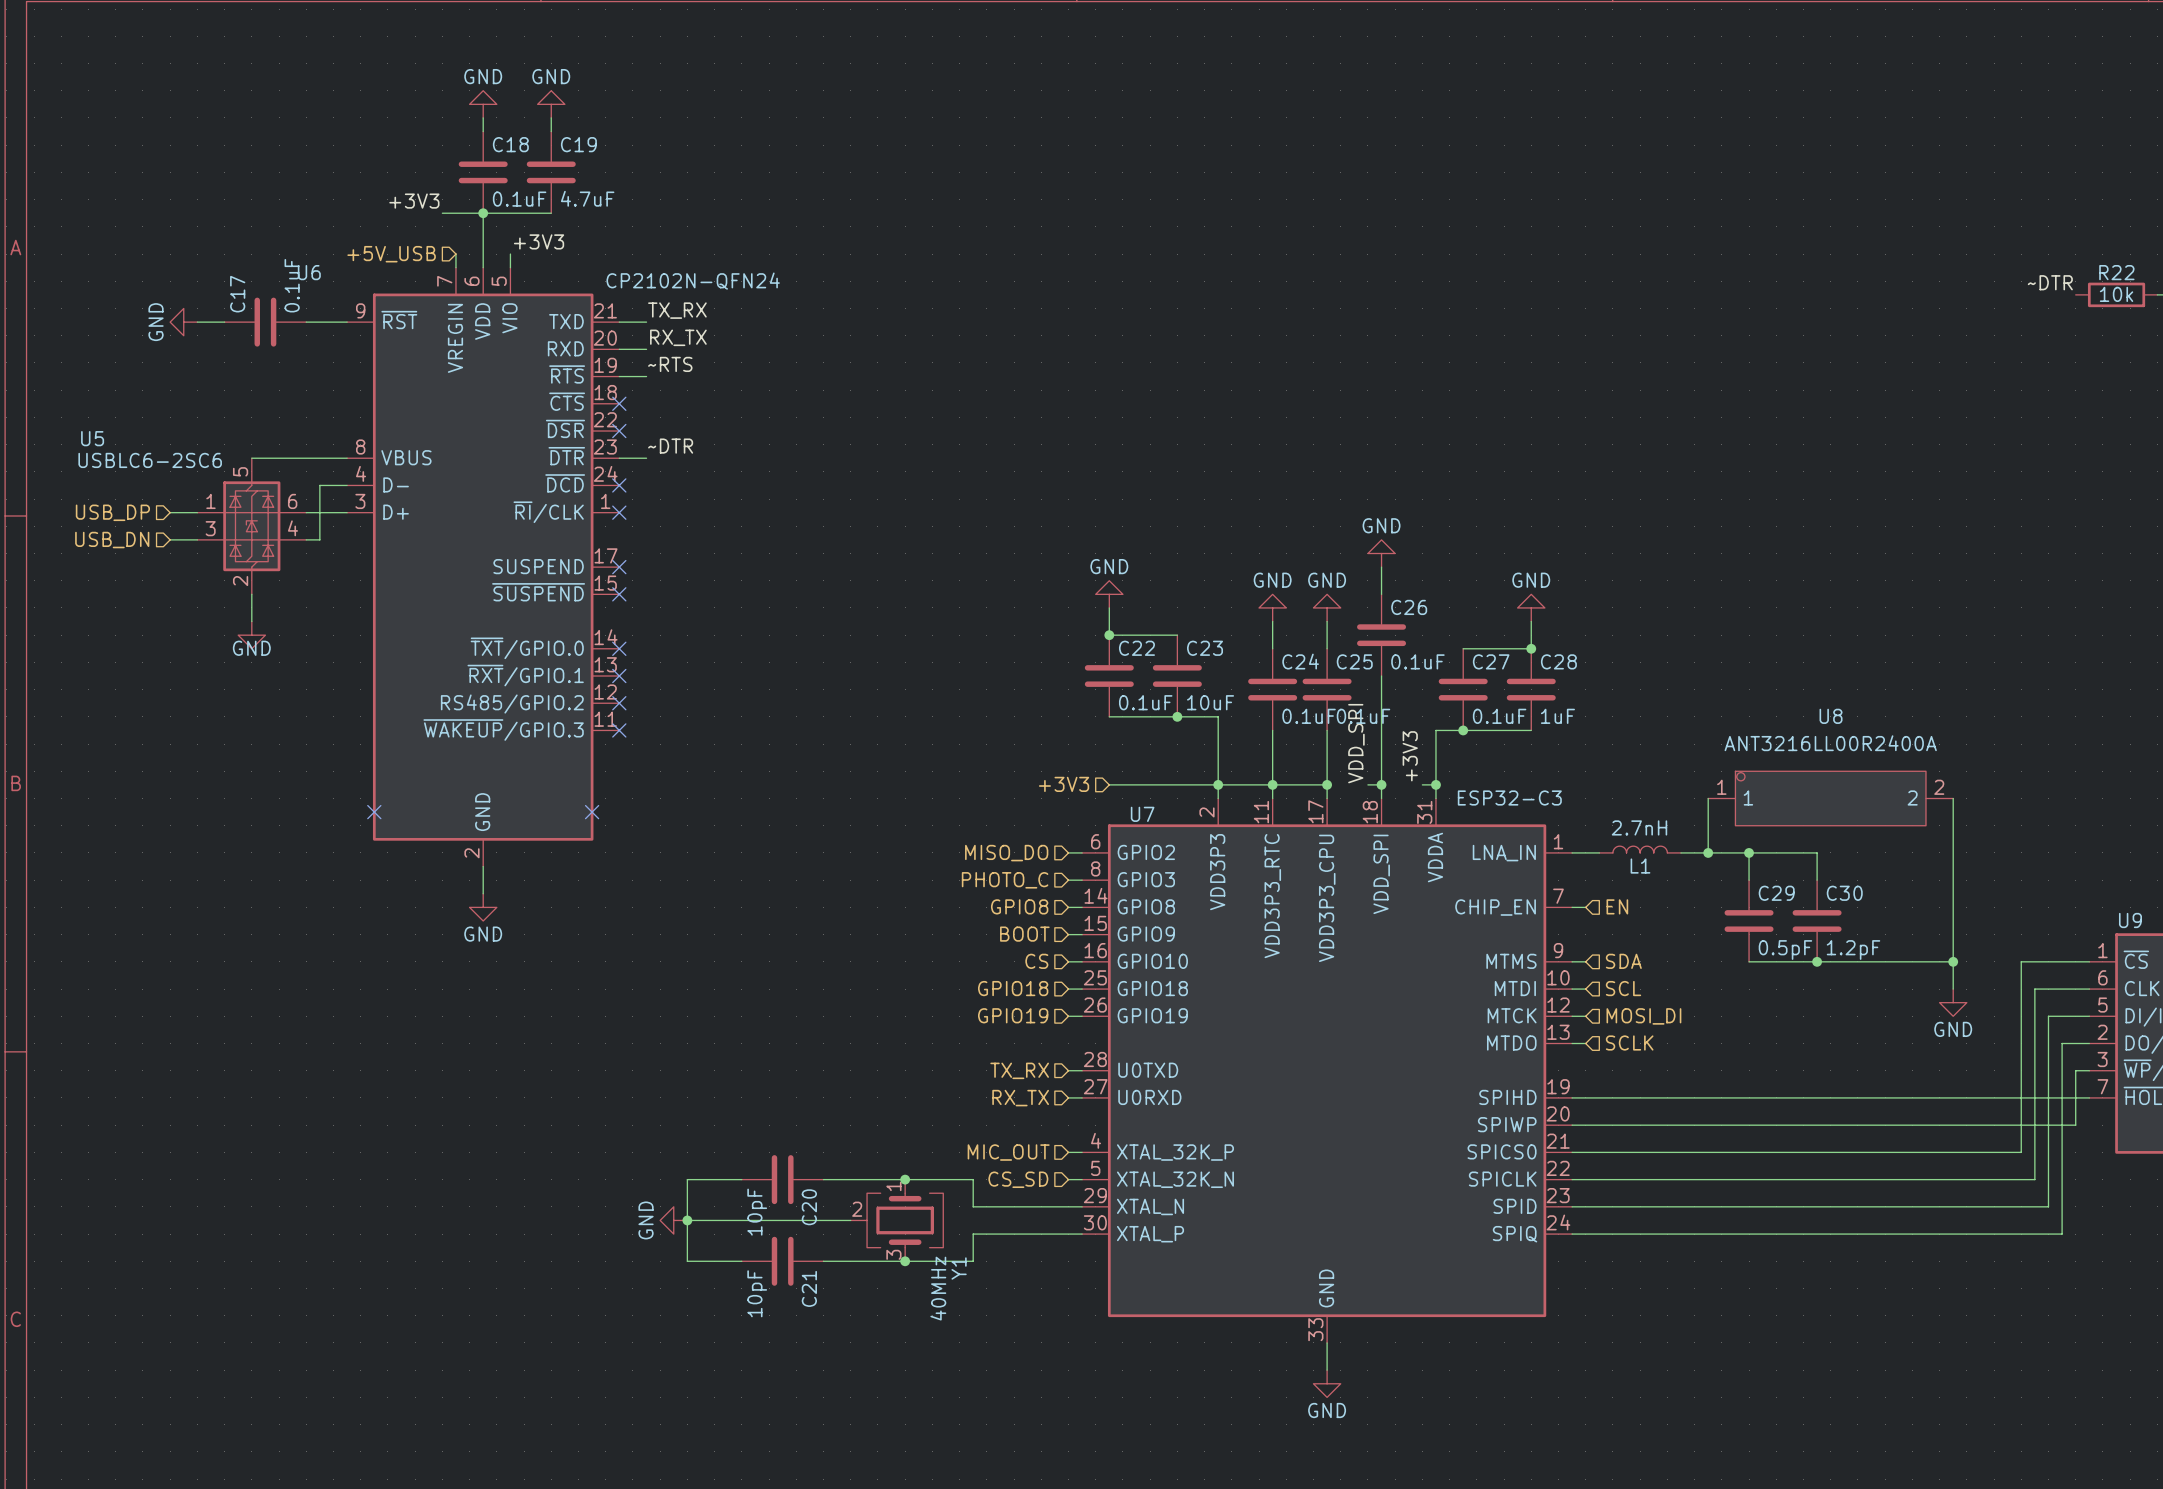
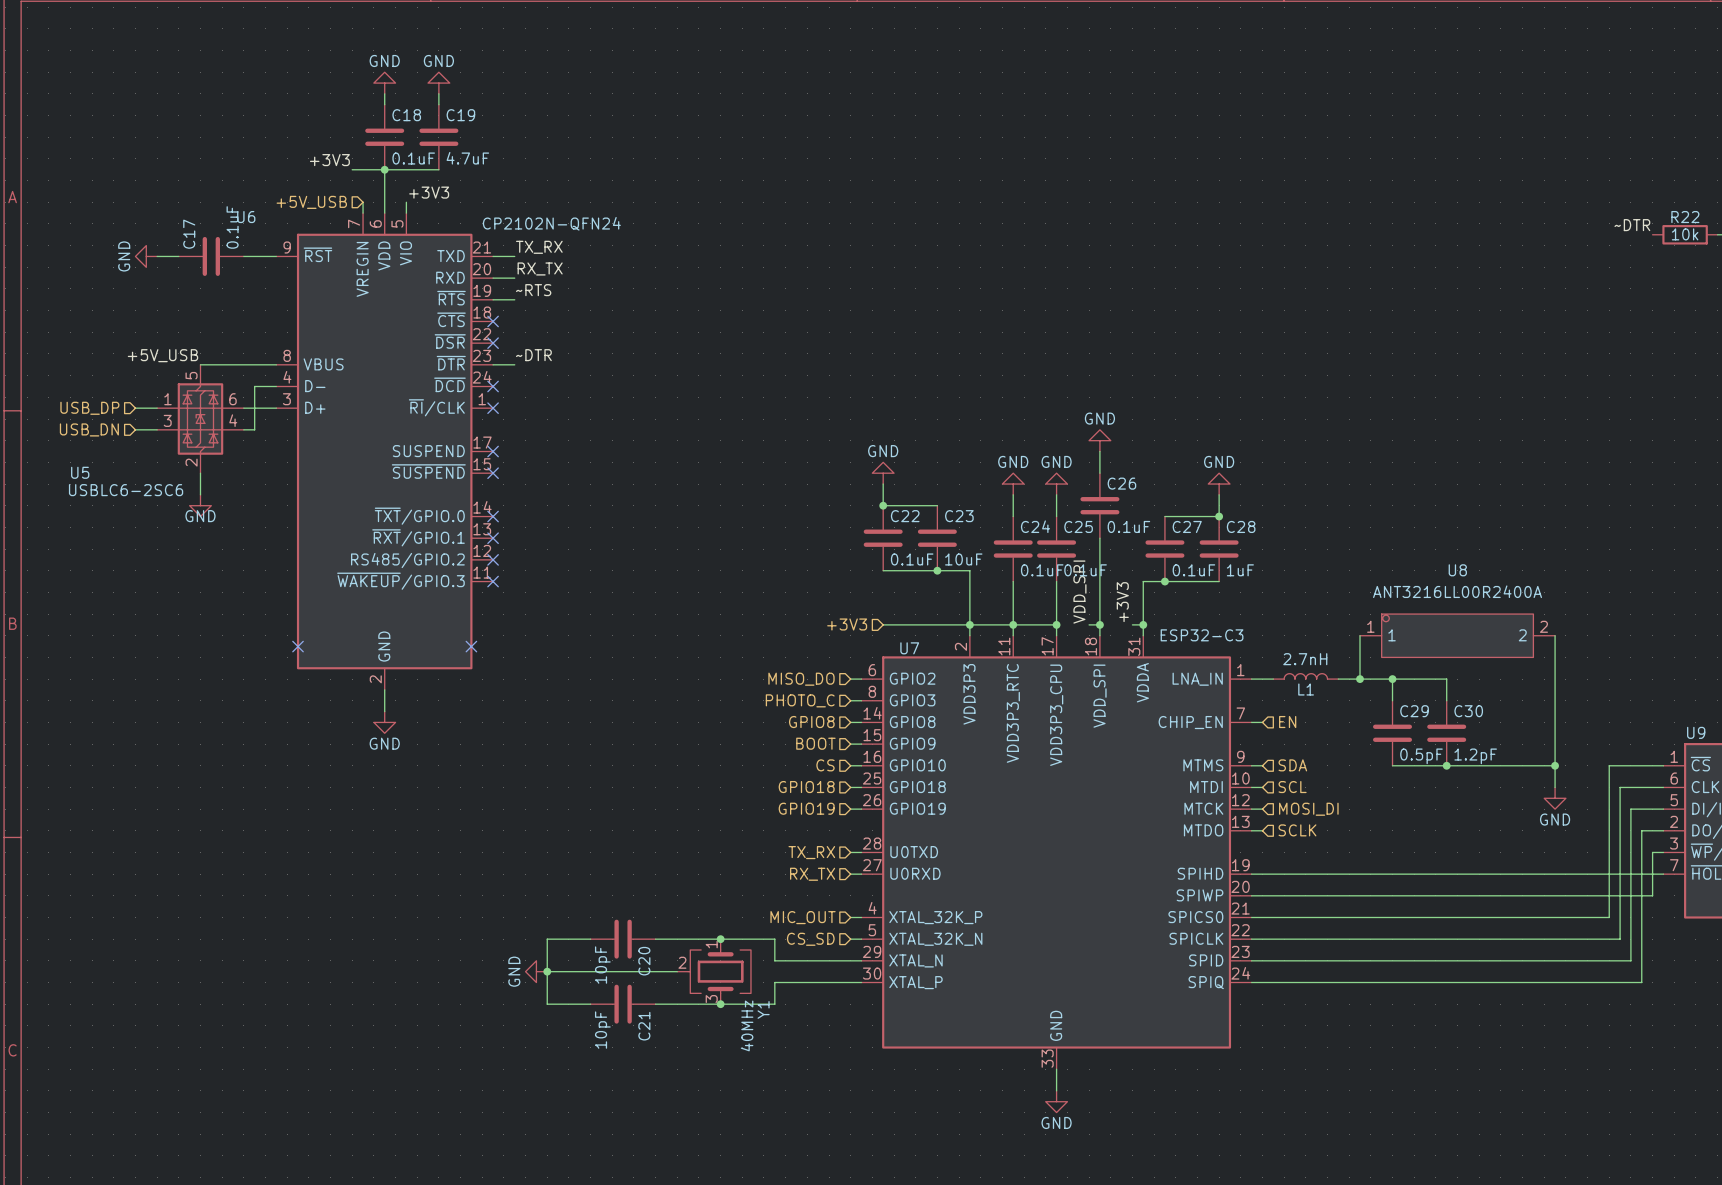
U5 name position: U5 (92, 438) -> U5 (80, 472)
label: none -> +5V_USB (162, 355)
U5 value position: USBLC6-2SC6 (150, 460) -> USBLC6-2SC6 (126, 490)

